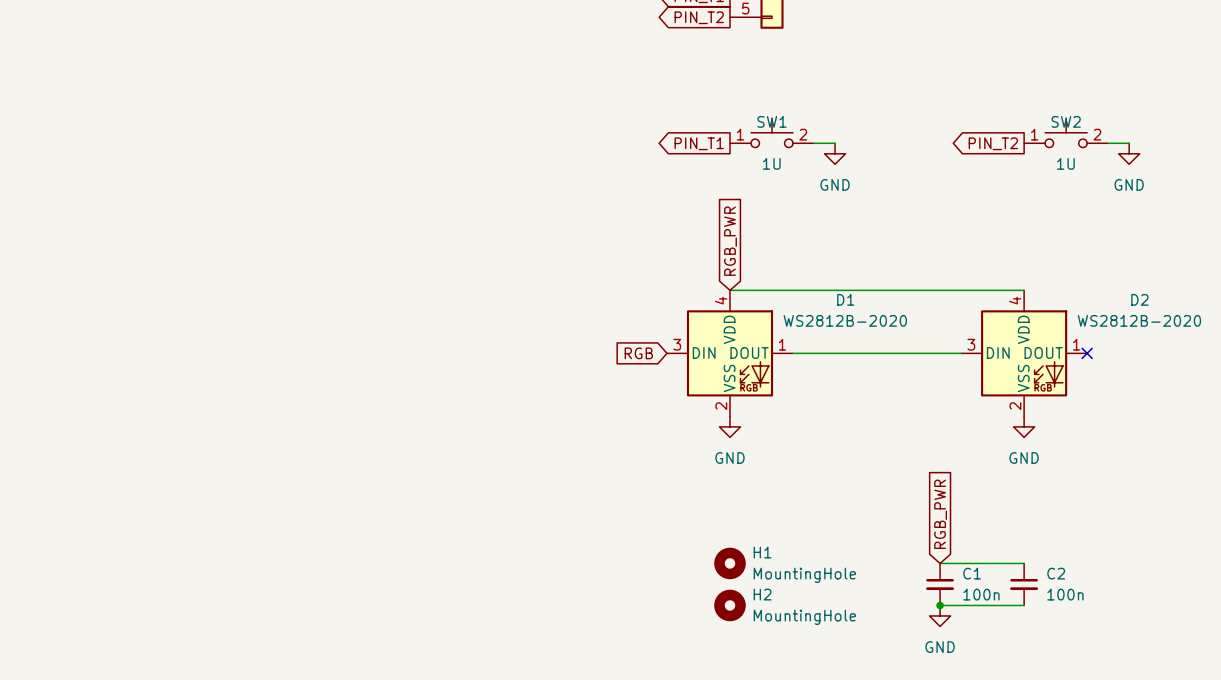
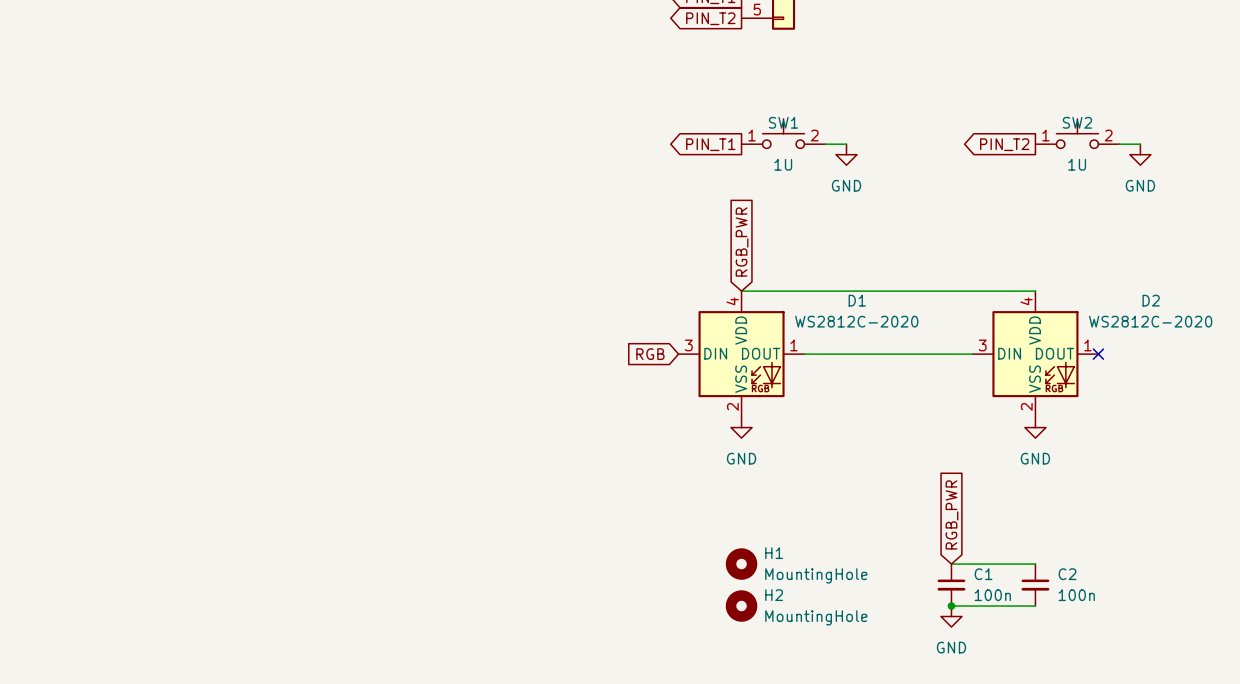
D1 value: WS2812B-2020 (845, 320) -> WS2812C-2020 (856, 321)
D2 value: WS2812B-2020 (1139, 320) -> WS2812C-2020 (1150, 321)

